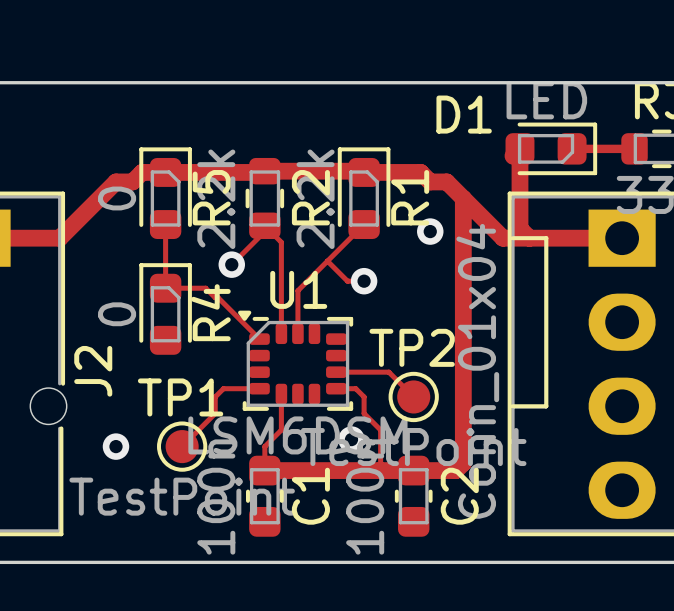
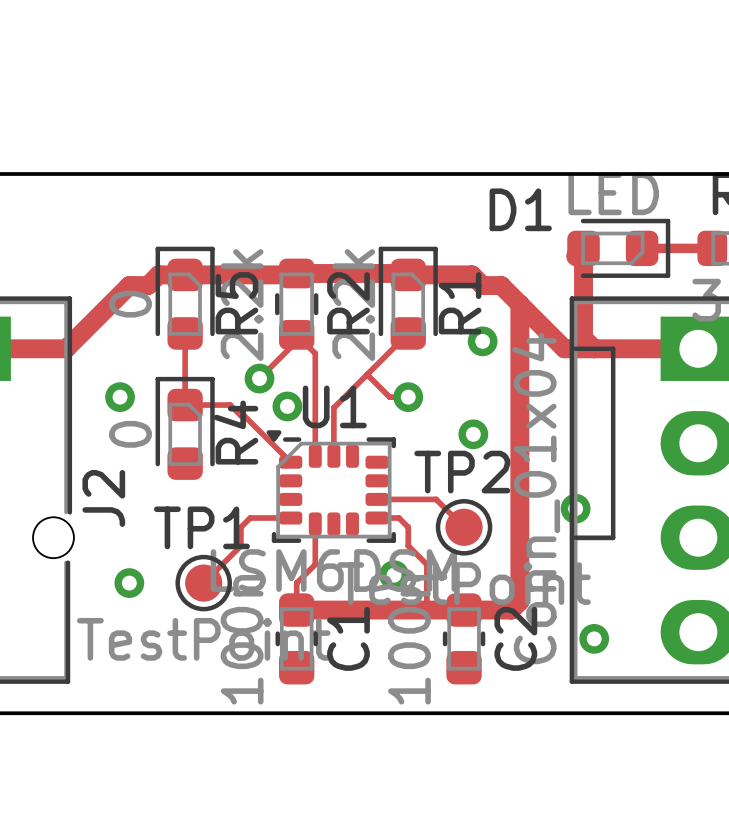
via: none -> (120, 397)
via: none -> (287, 406)
via: none -> (473, 434)
via: none -> (575, 508)
via: none -> (594, 638)

